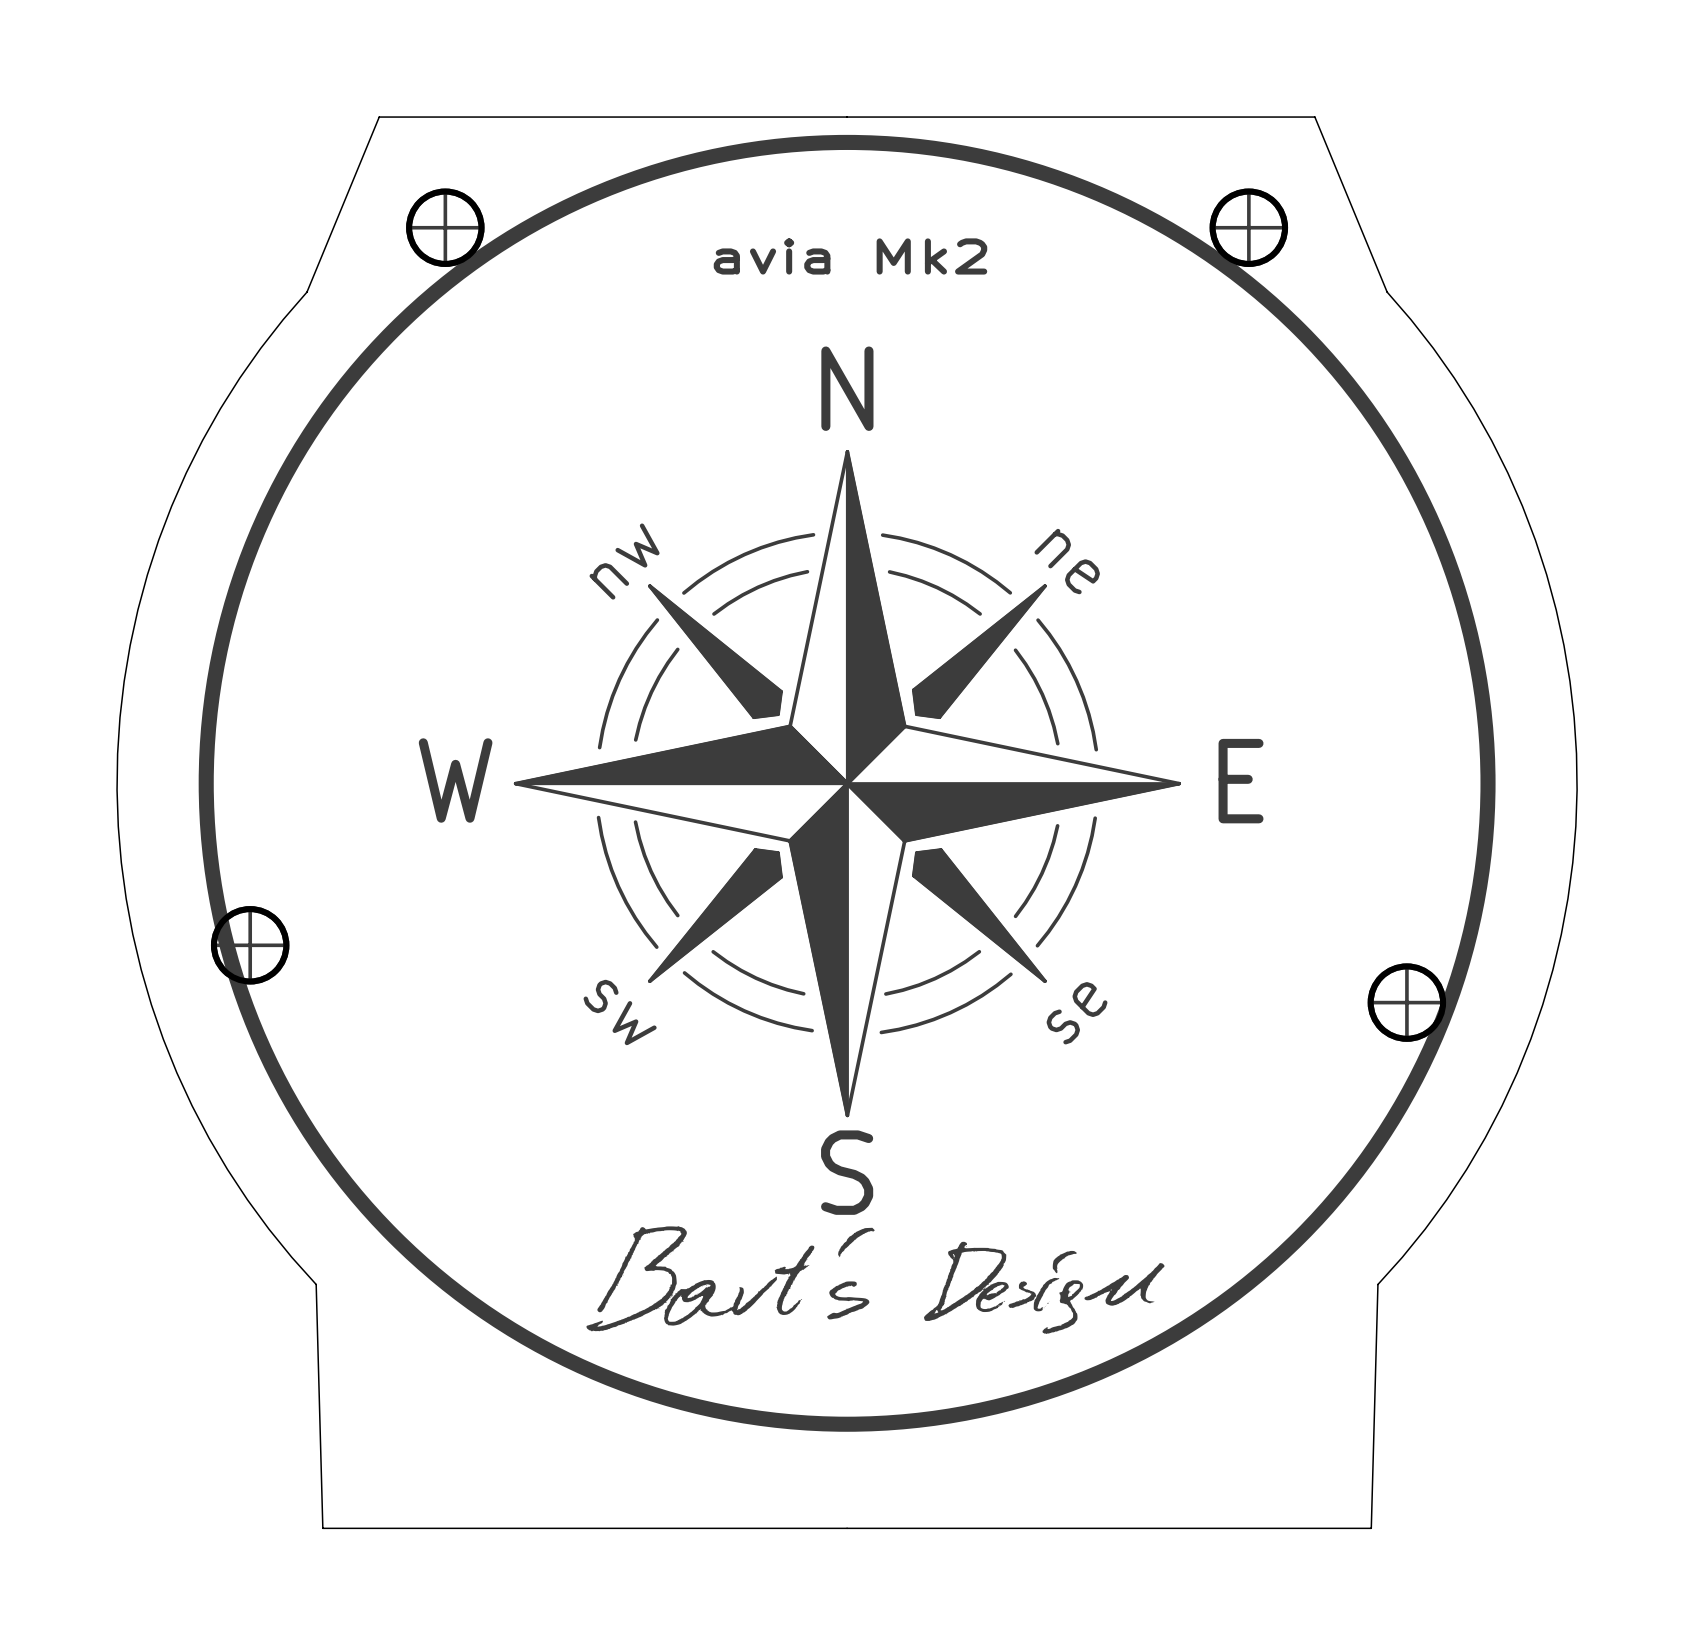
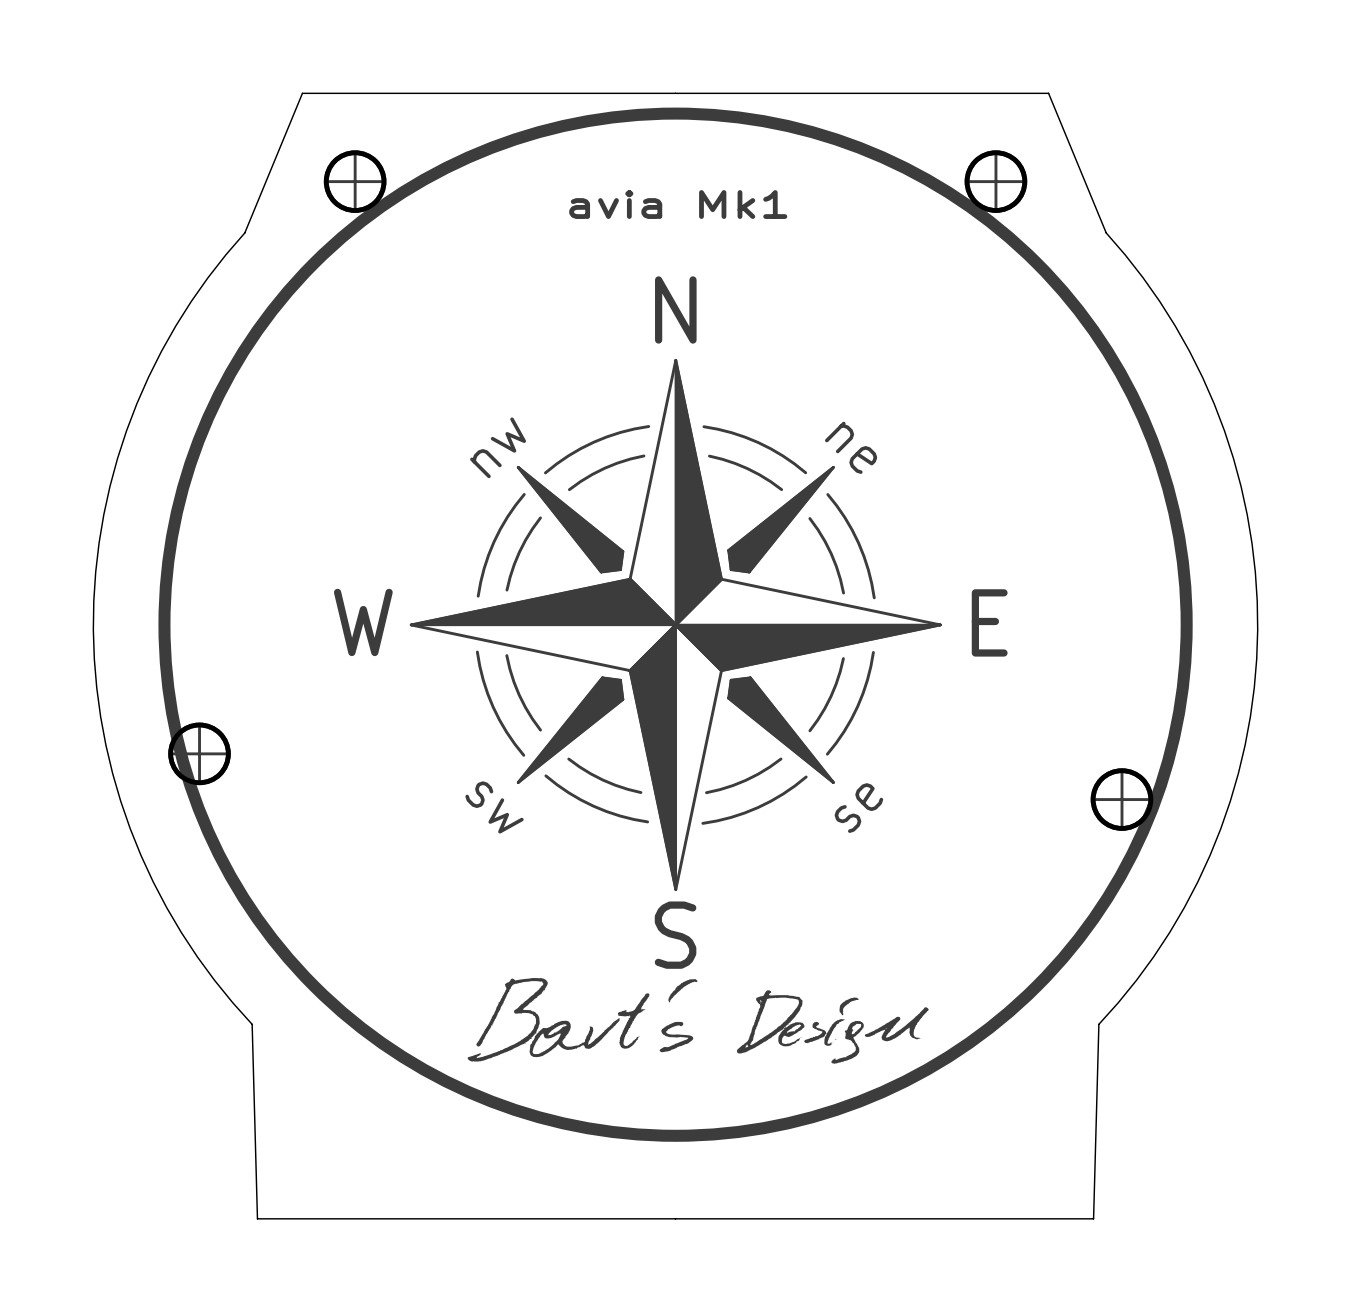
text: avia Mk2 (850, 256) -> avia Mk1 (678, 204)

